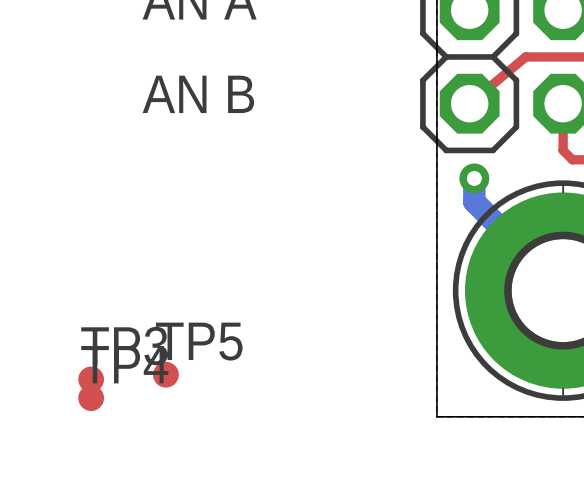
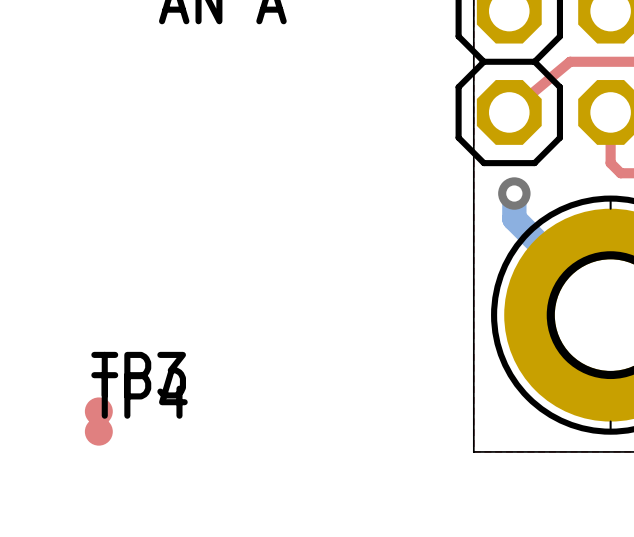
text: AN B (198, 94) -> none
TP5: (165, 374) -> none

